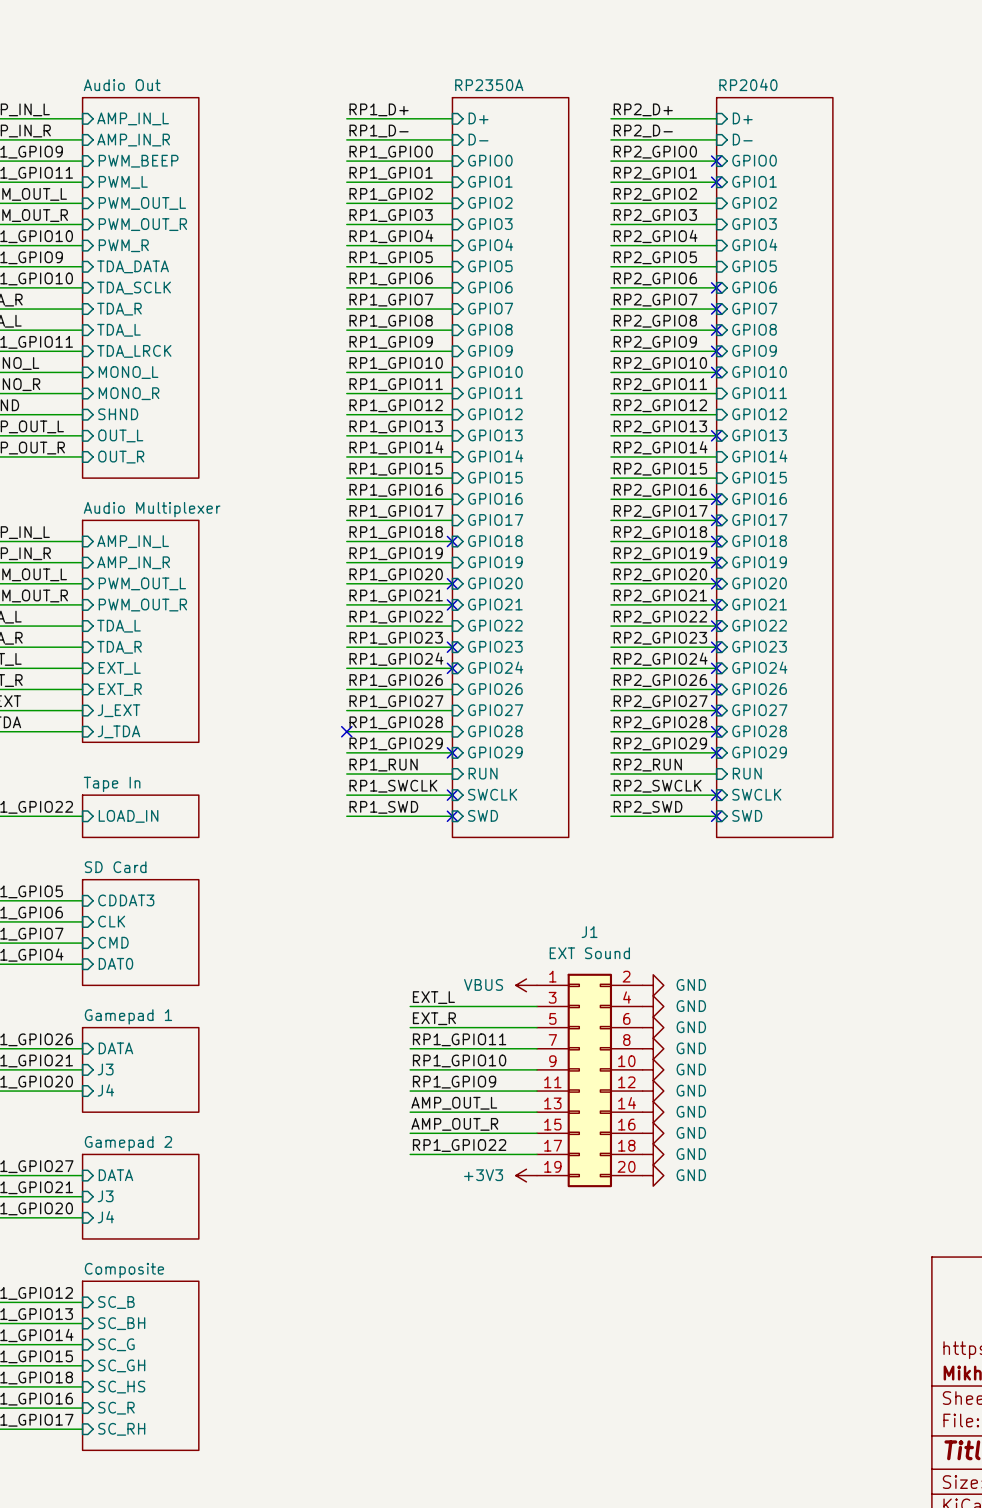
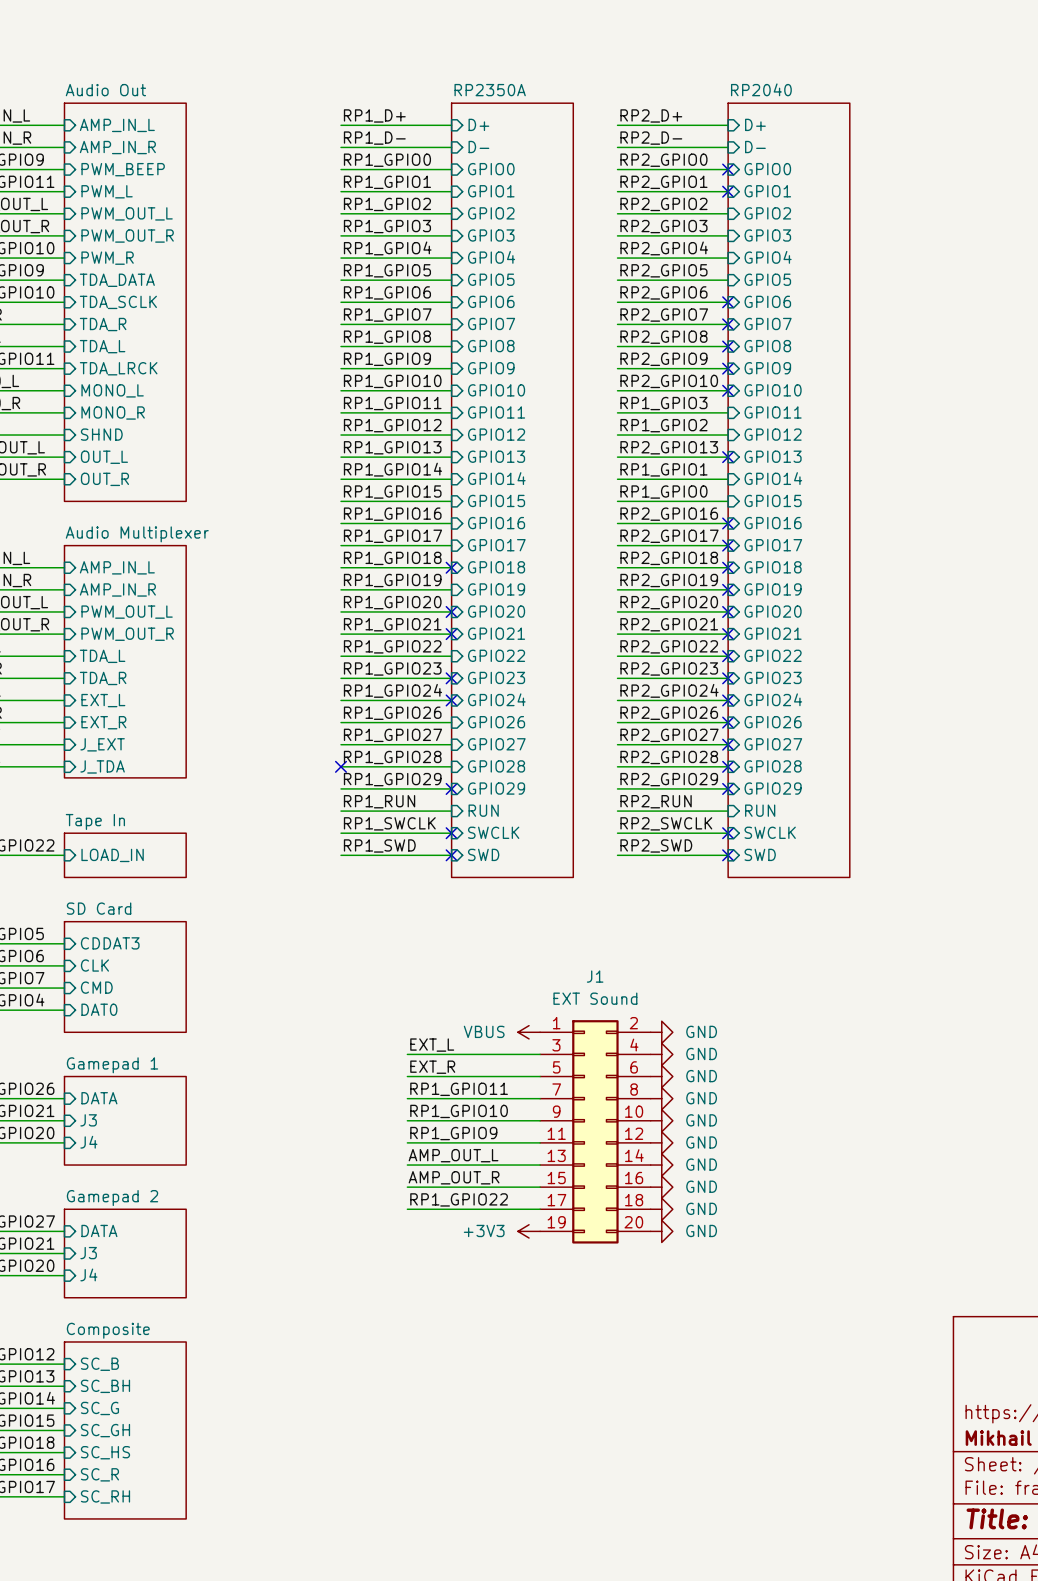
label: RP2_GPIO11 (660, 384) -> RP1_GPIO3 (663, 403)
label: RP2_GPIO12 (660, 405) -> RP1_GPIO2 (663, 425)
label: RP2_GPIO14 (660, 447) -> RP1_GPIO1 (663, 469)
label: RP2_GPIO15 (660, 469) -> RP1_GPIO0 (663, 492)

